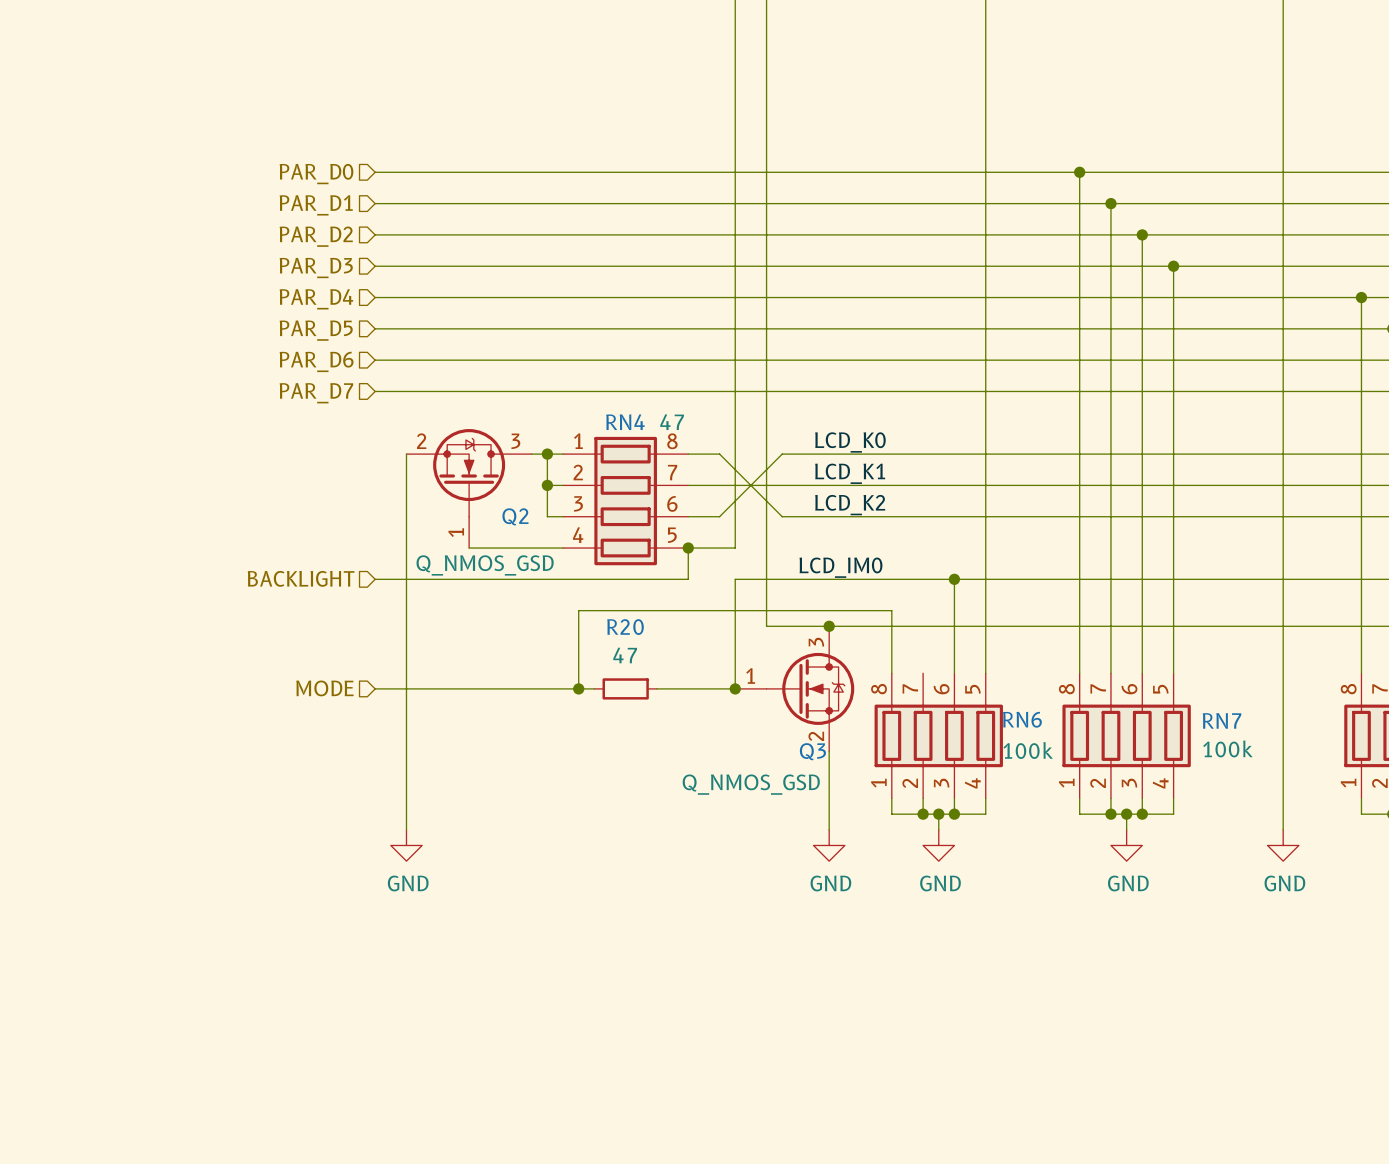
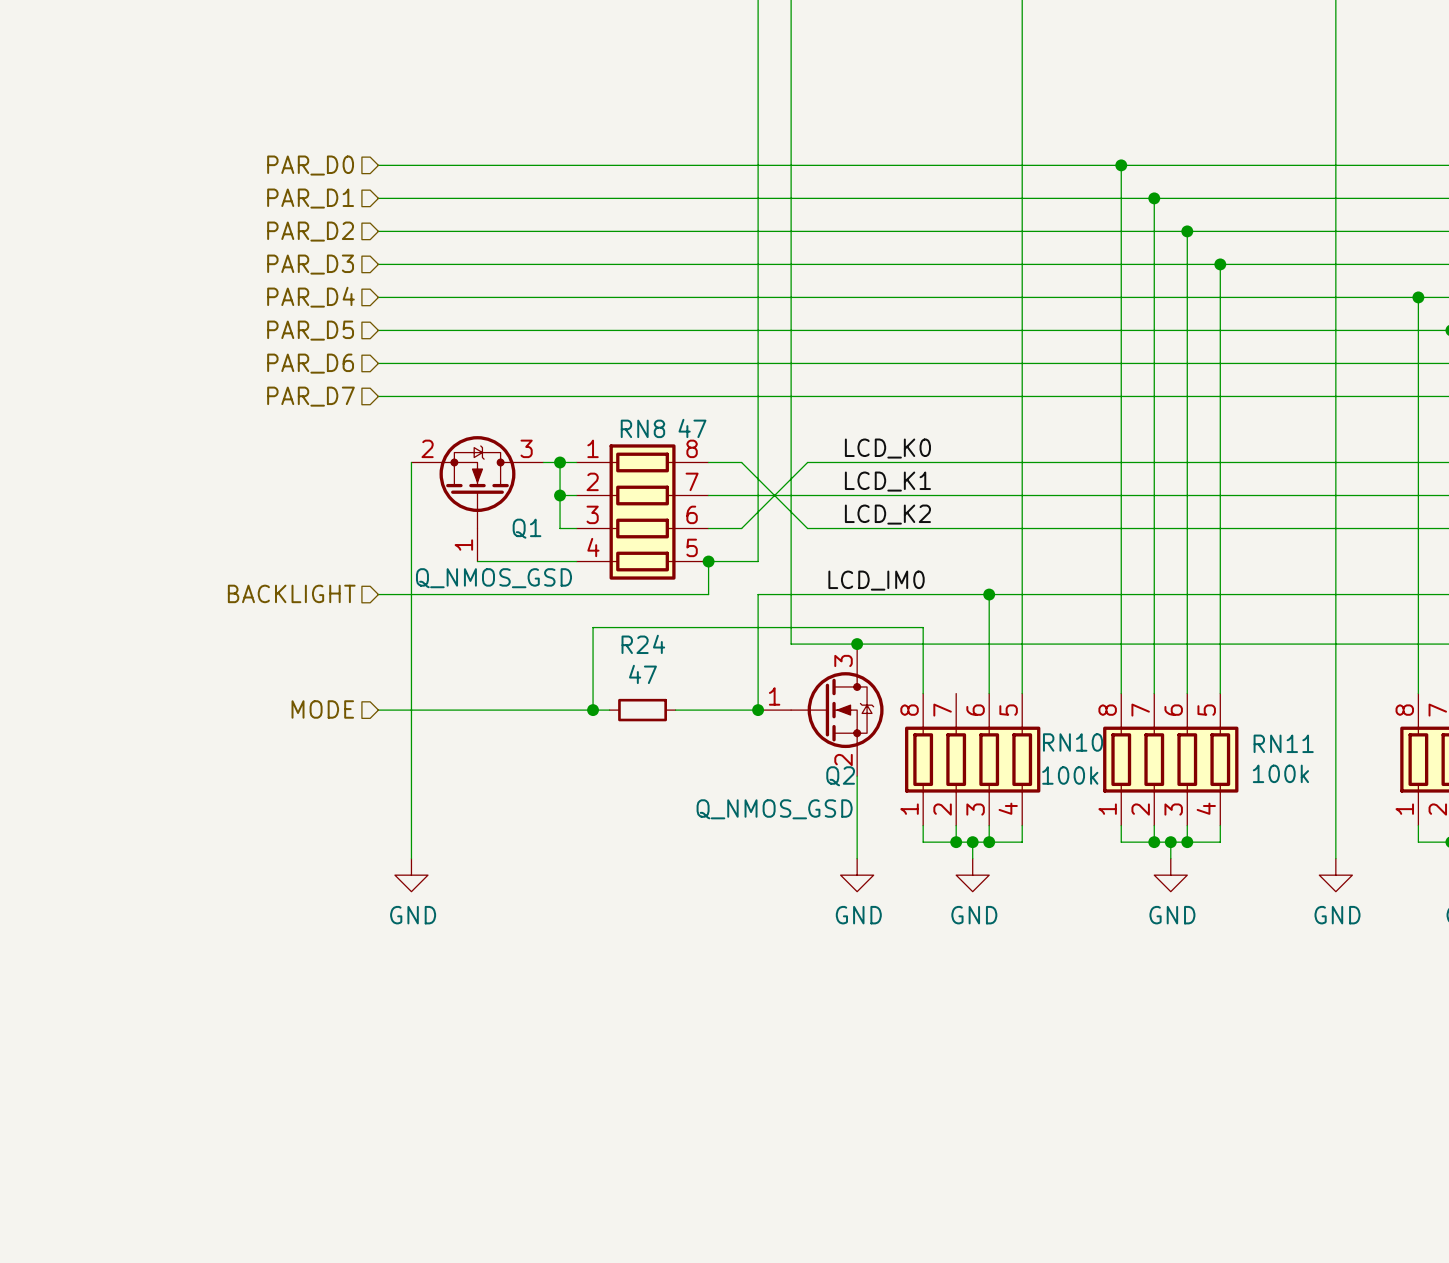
RN4 name: RN4 (625, 422) -> RN8 (642, 428)
Q2 name: Q2 (515, 516) -> Q1 (527, 528)
R20 name: R20 (625, 627) -> R24 (643, 644)
RN6 name: RN6 (1022, 719) -> RN10 (1073, 742)
RN7 name: RN7 (1222, 720) -> RN11 (1283, 743)
Q3 name: Q3 (812, 751) -> Q2 (840, 776)

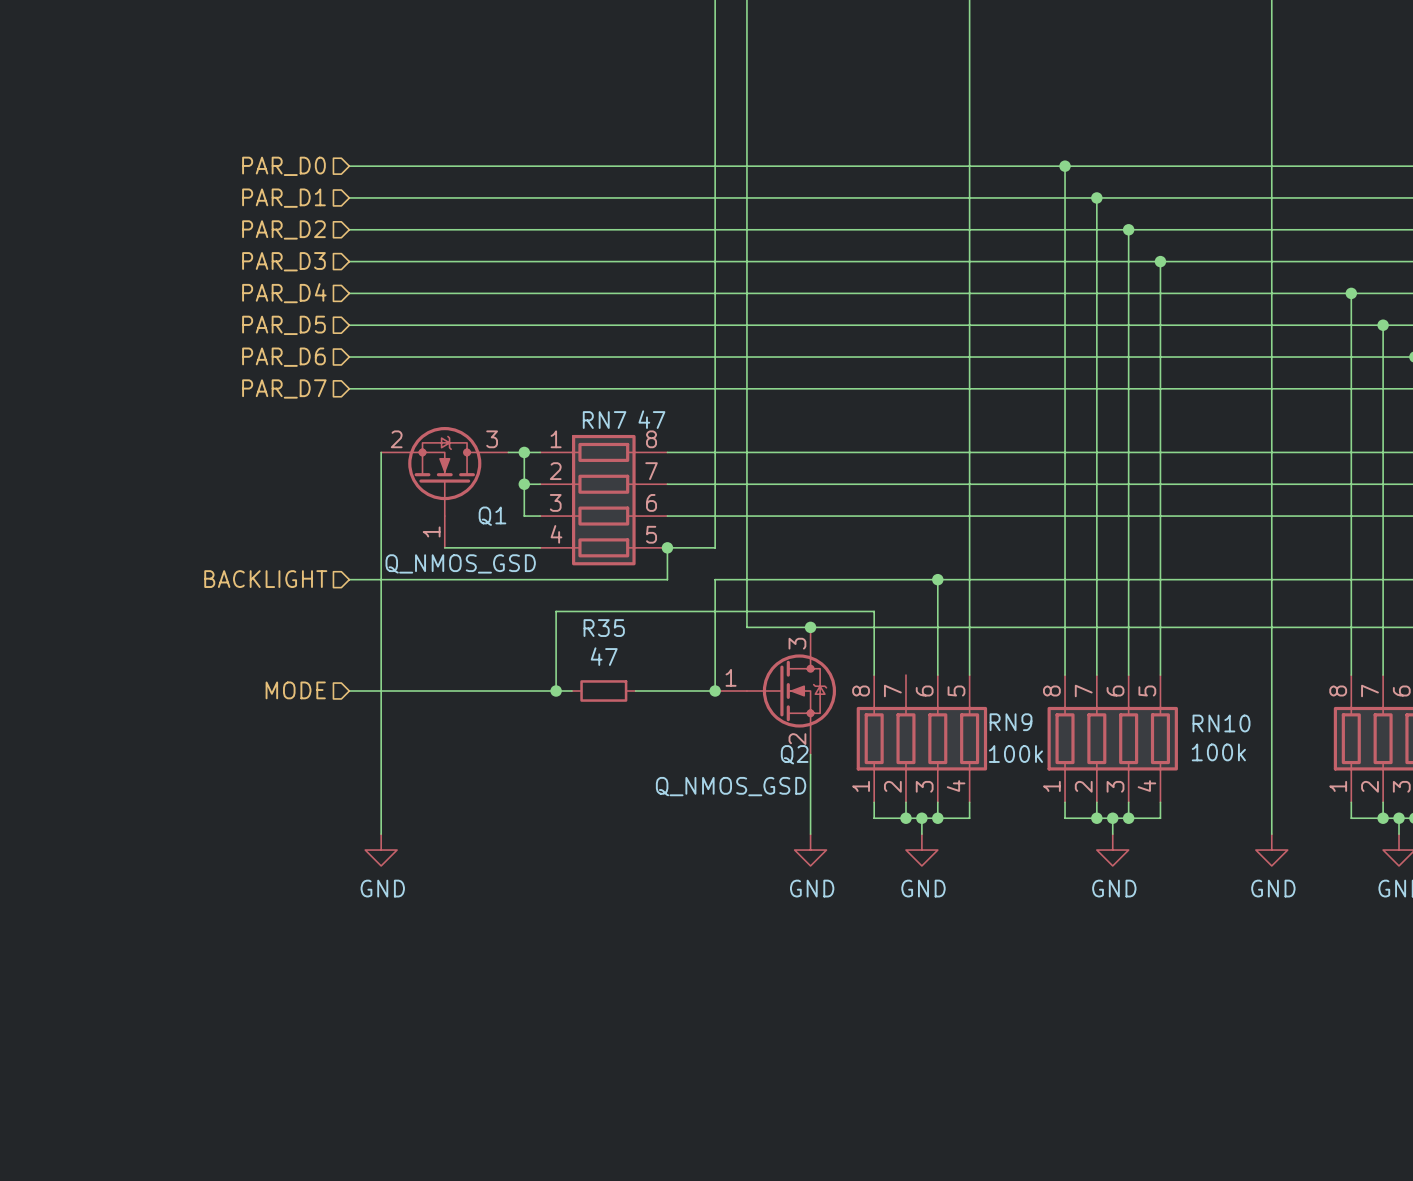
RN8 name: RN8 (642, 428) -> RN7 (604, 420)
label: LCD_K0 (887, 448) -> none
wire: (741, 462) (807, 528) -> (699, 452) (762, 452)
wire: (807, 462) (741, 528) -> (762, 516) (699, 516)
label: LCD_K1 (887, 481) -> none
label: LCD_K2 (887, 514) -> none
label: LCD_IM0 (876, 580) -> none
R24 name: R24 (643, 644) -> R35 (604, 628)
RN10 name: RN10 (1073, 742) -> RN9 (1011, 722)
RN11 name: RN11 (1283, 743) -> RN10 (1221, 723)

